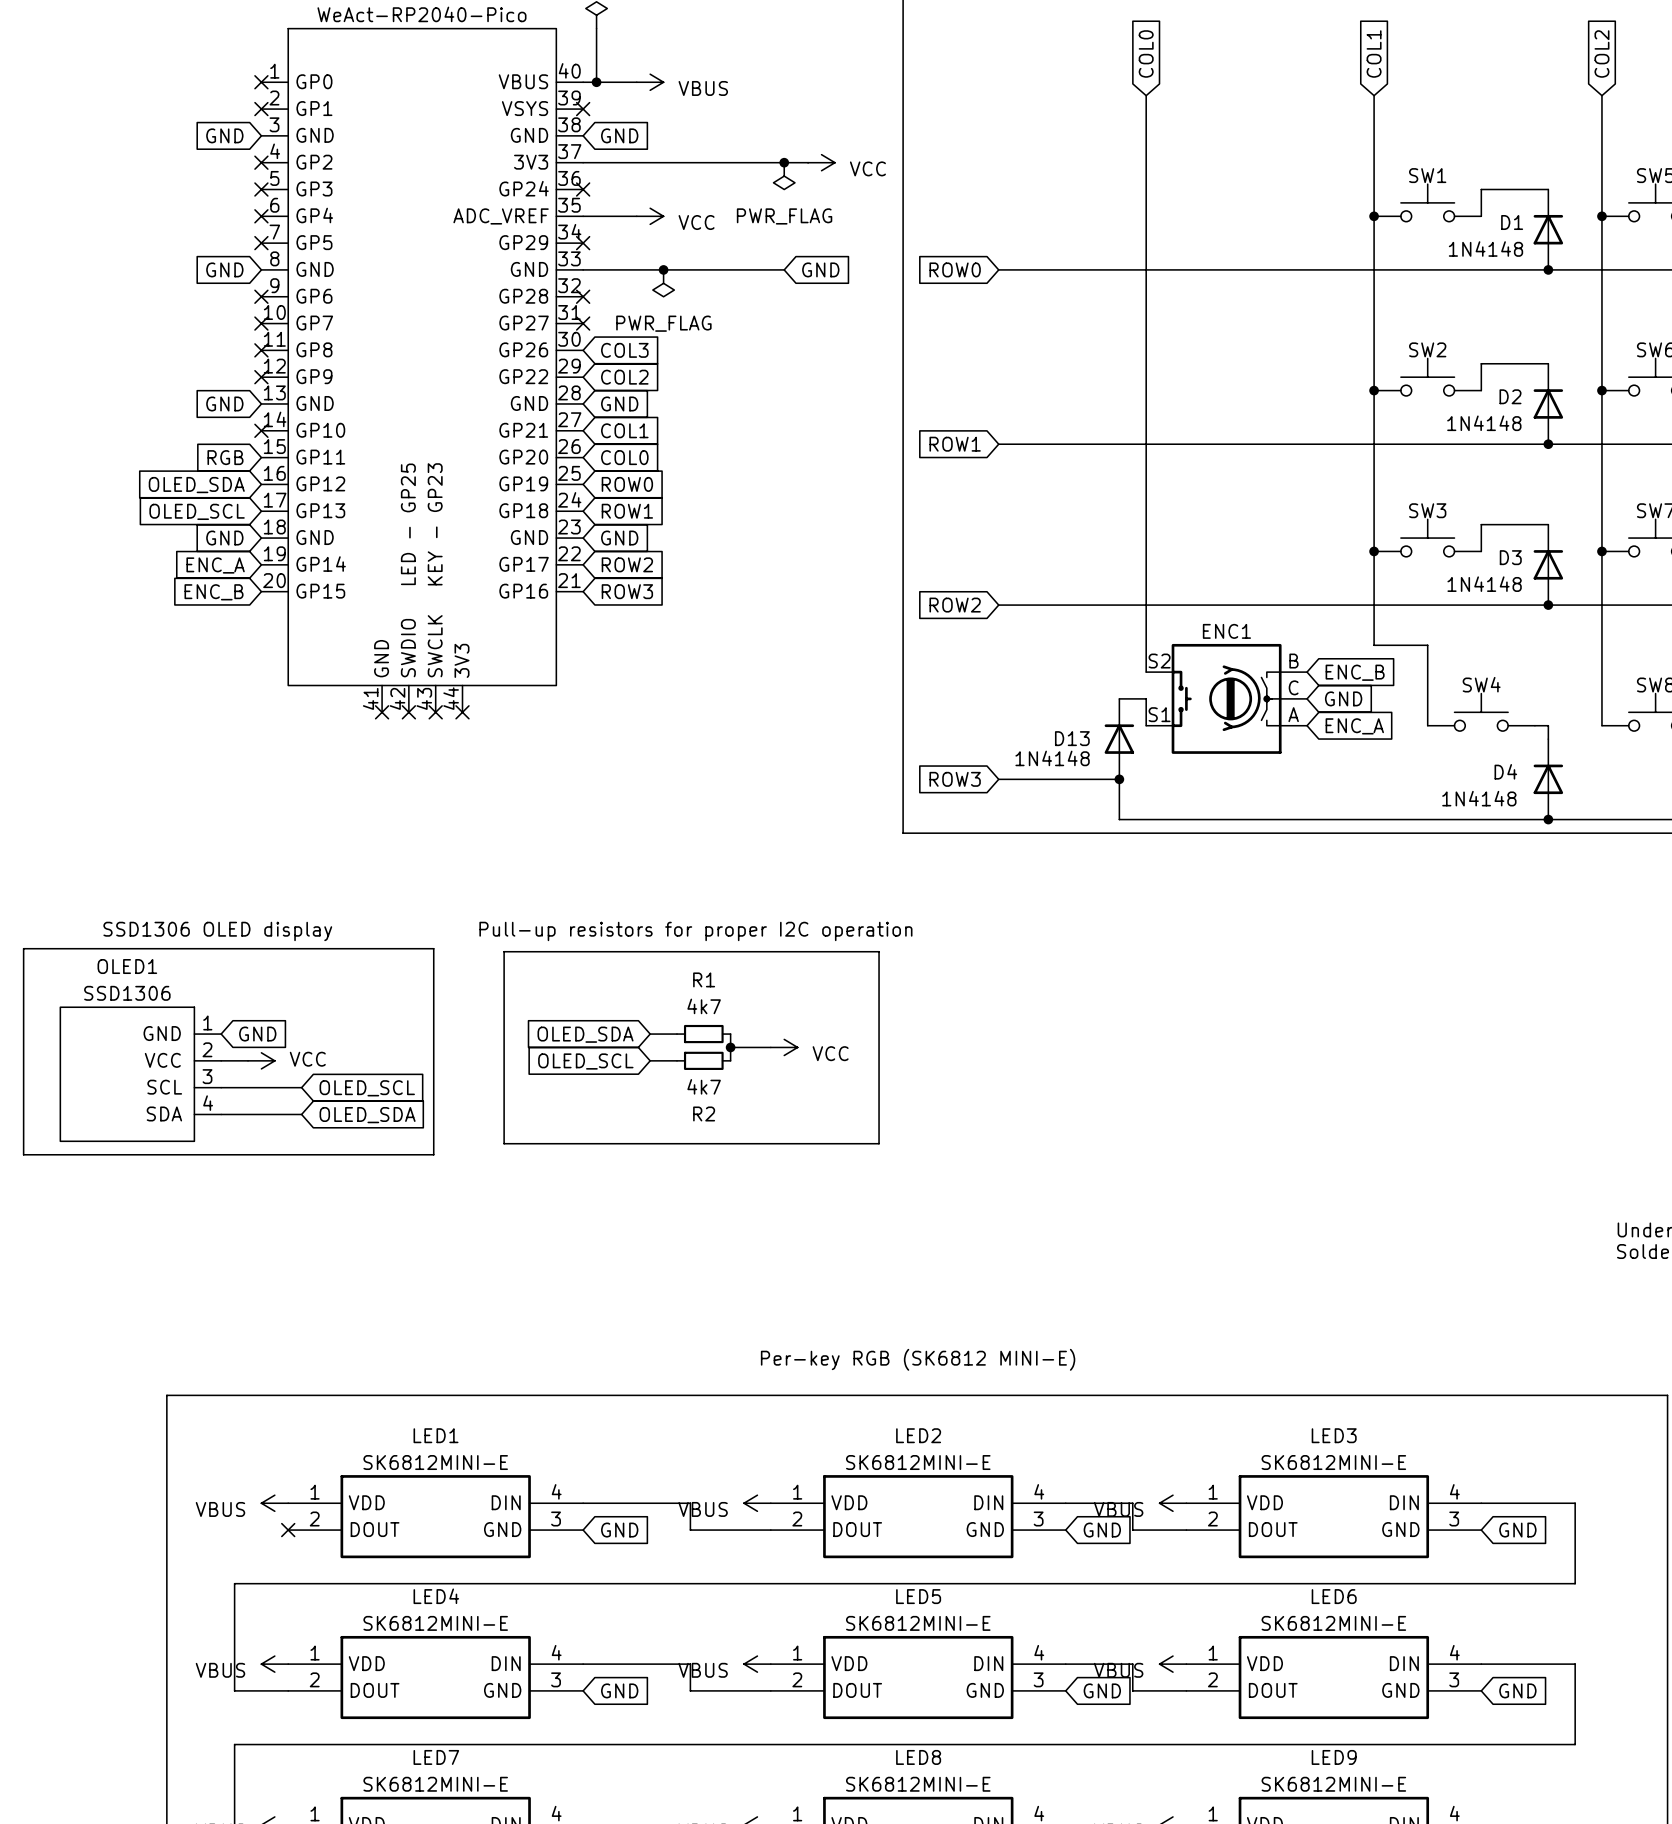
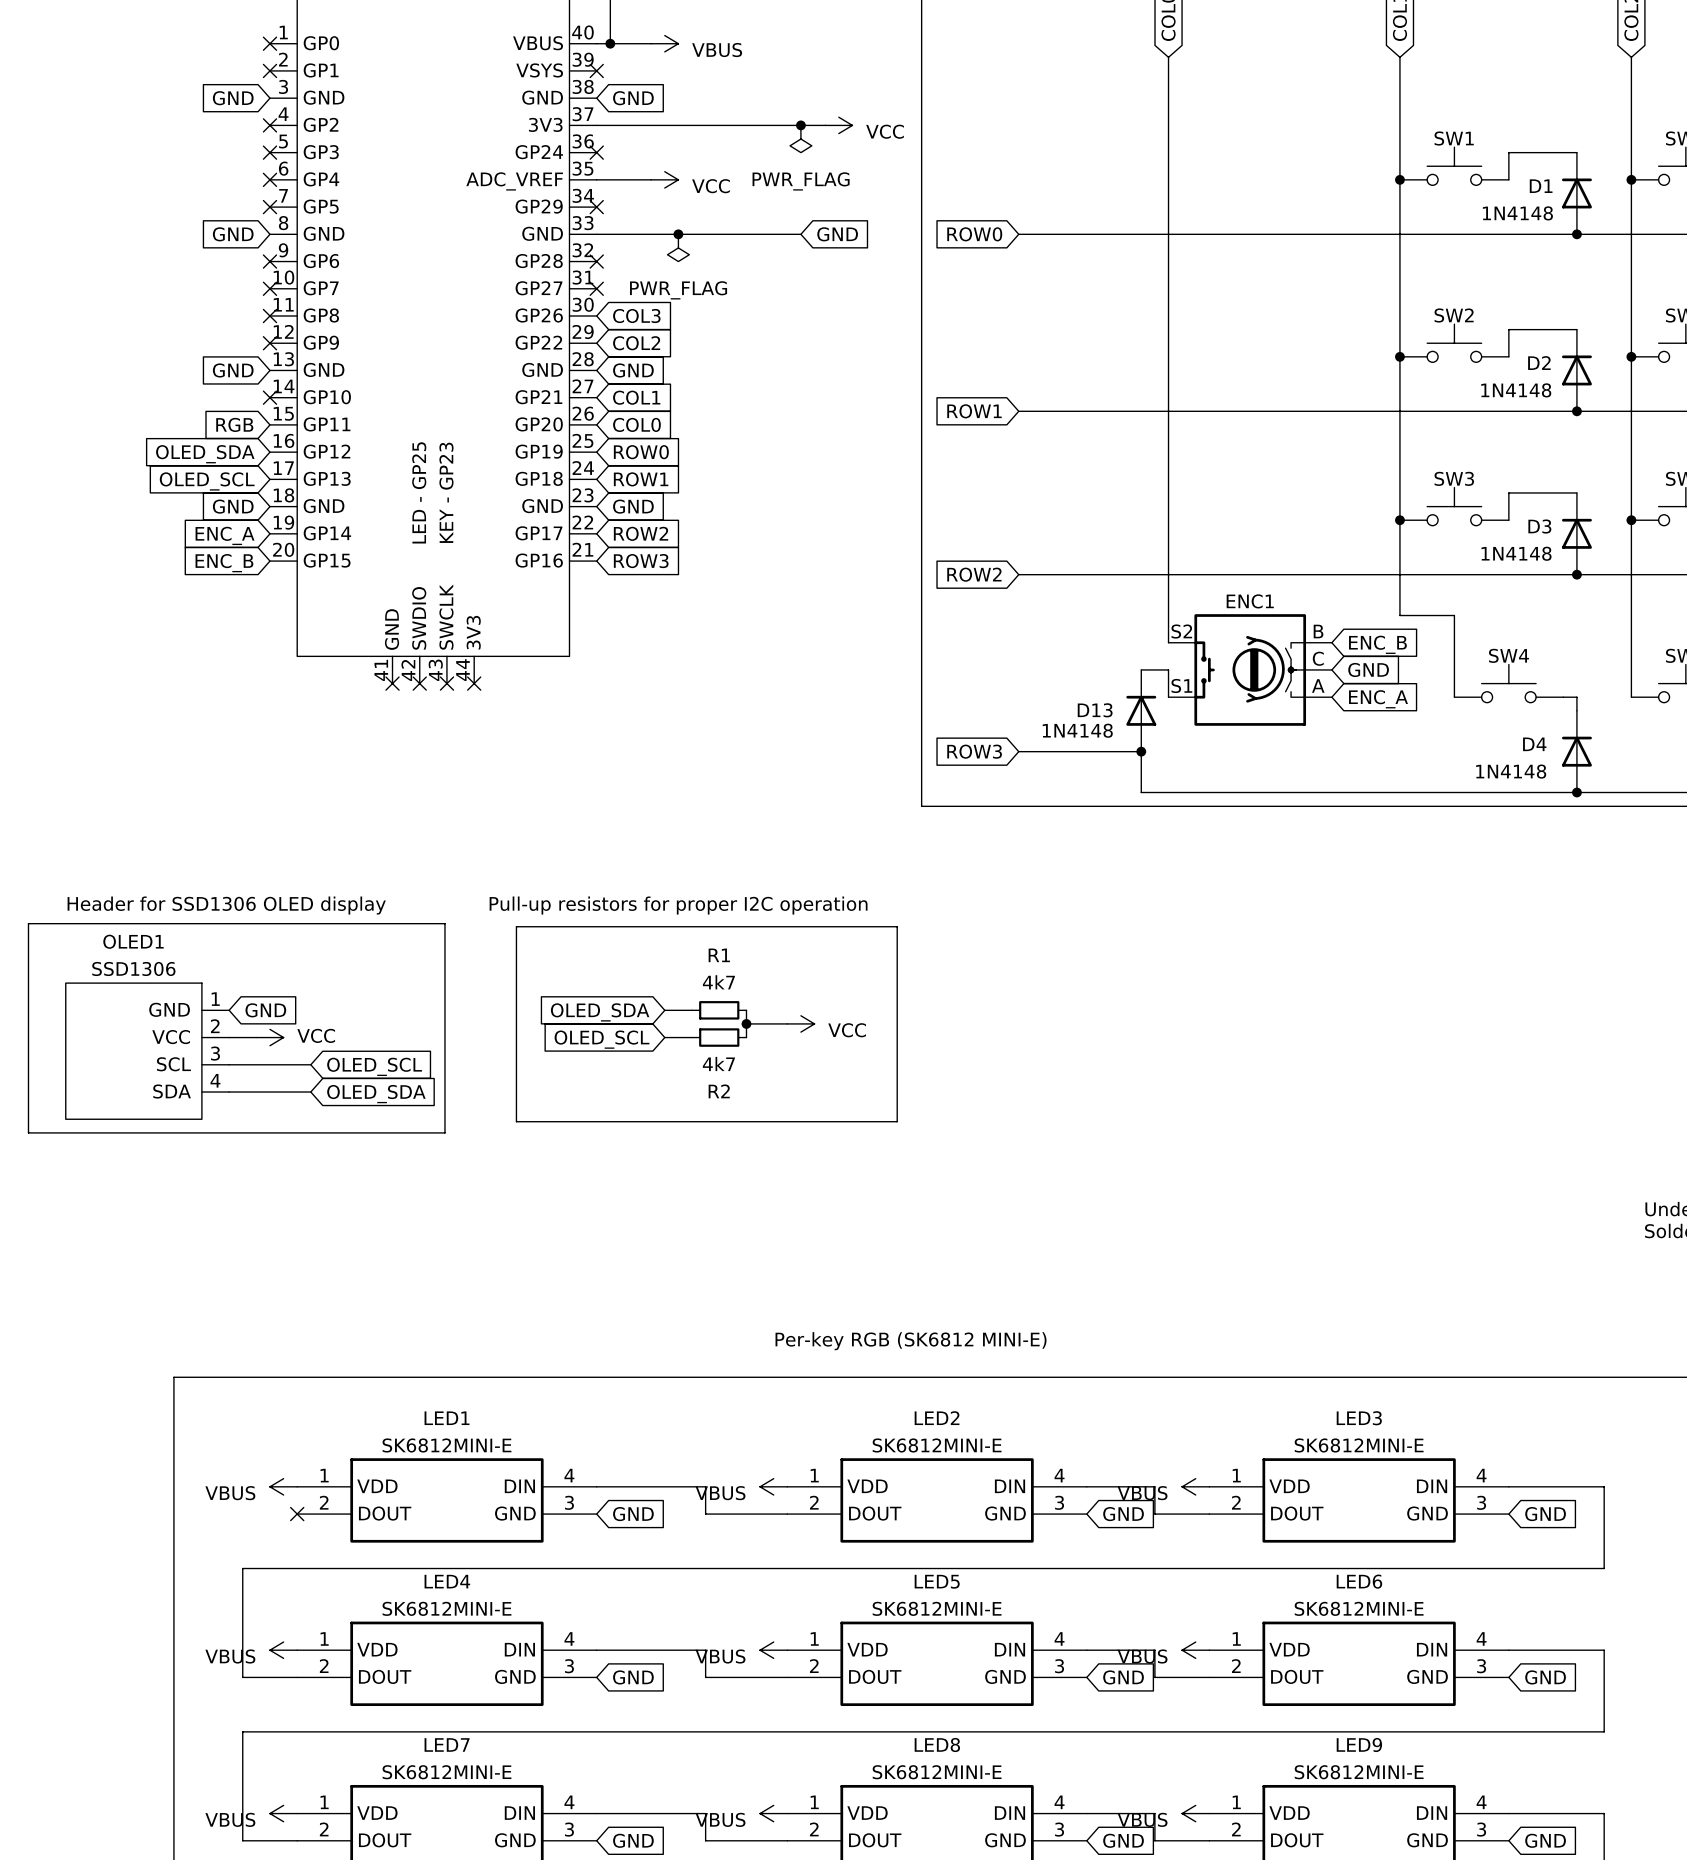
text: SSD1306 OLED display (217, 931) -> Header for SSD1306 OLED display (226, 905)

